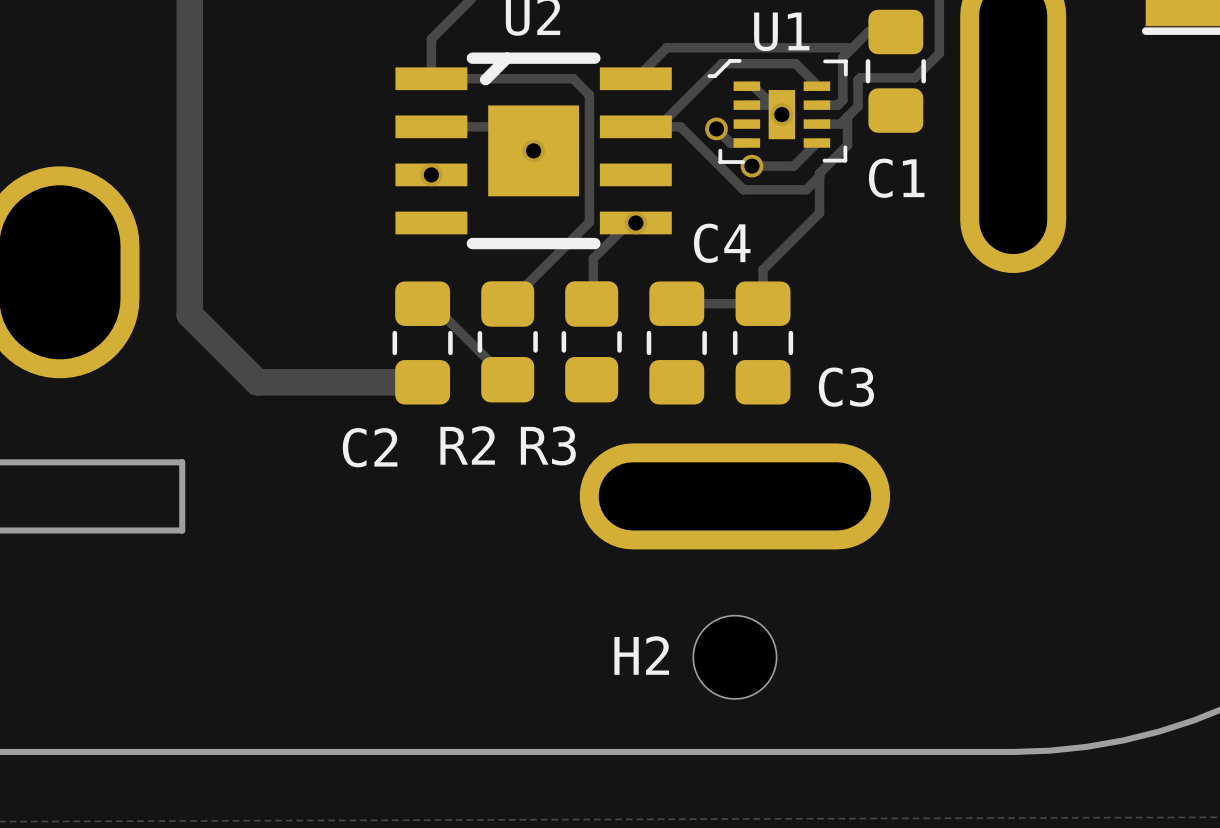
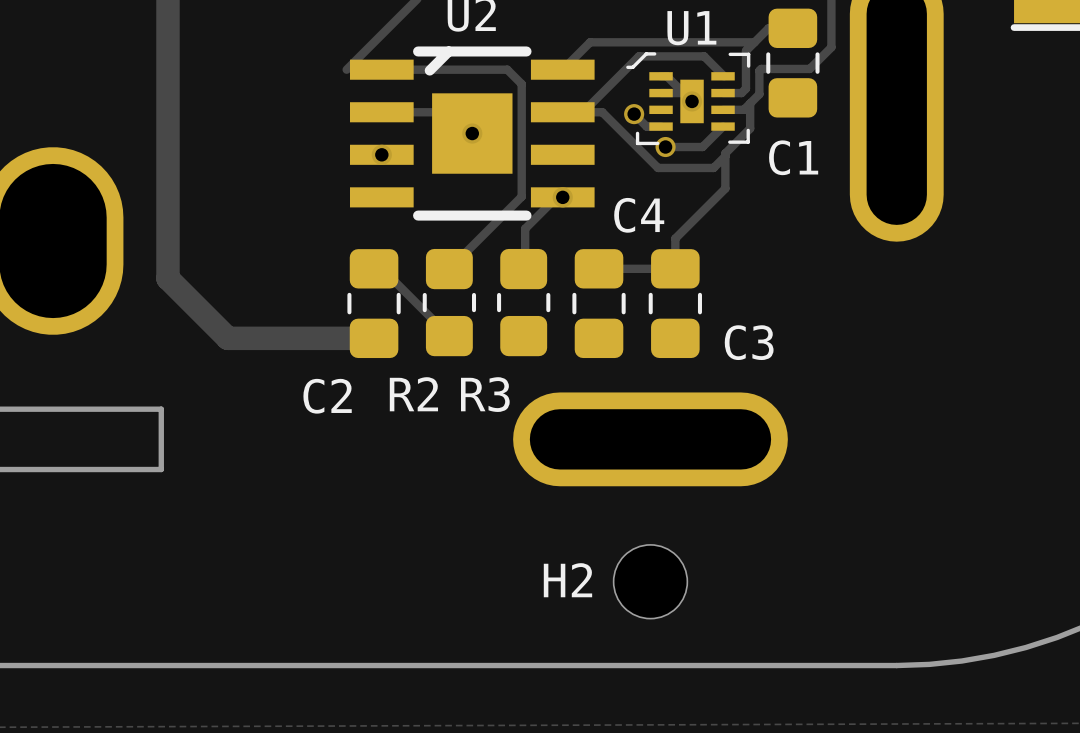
track: (431, 39) (431, 78) -> (381, 34) (346, 69)

